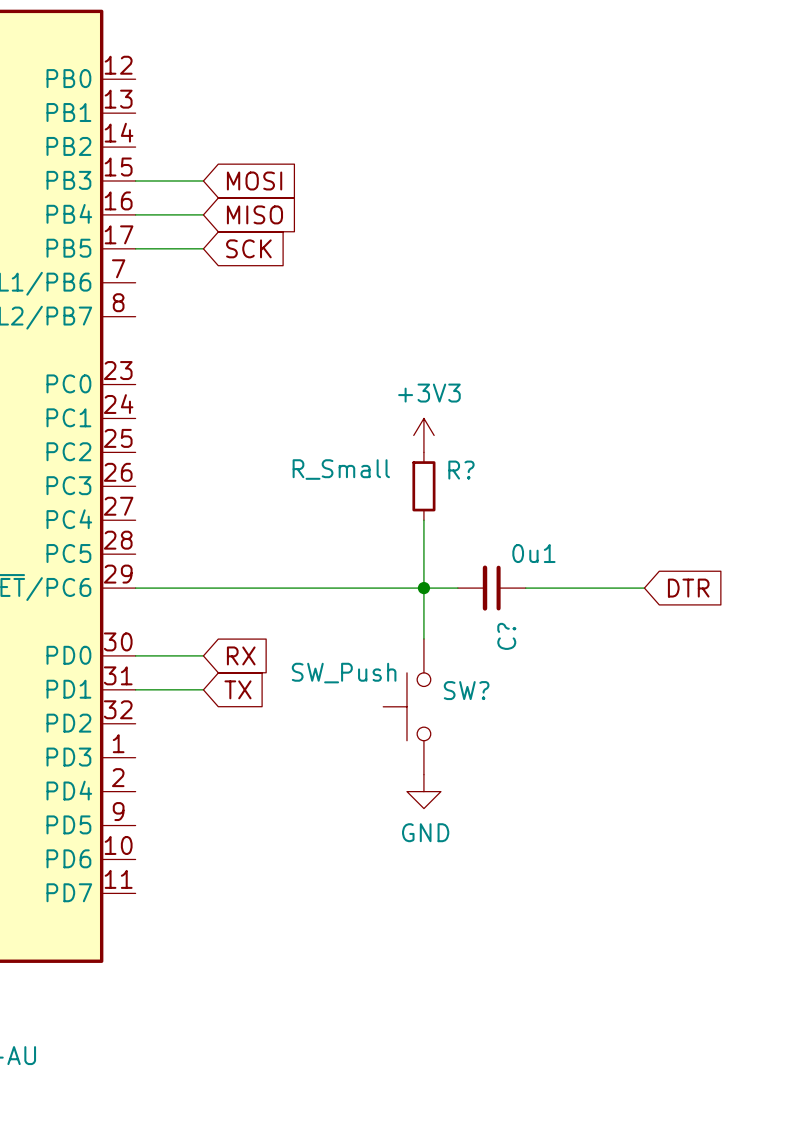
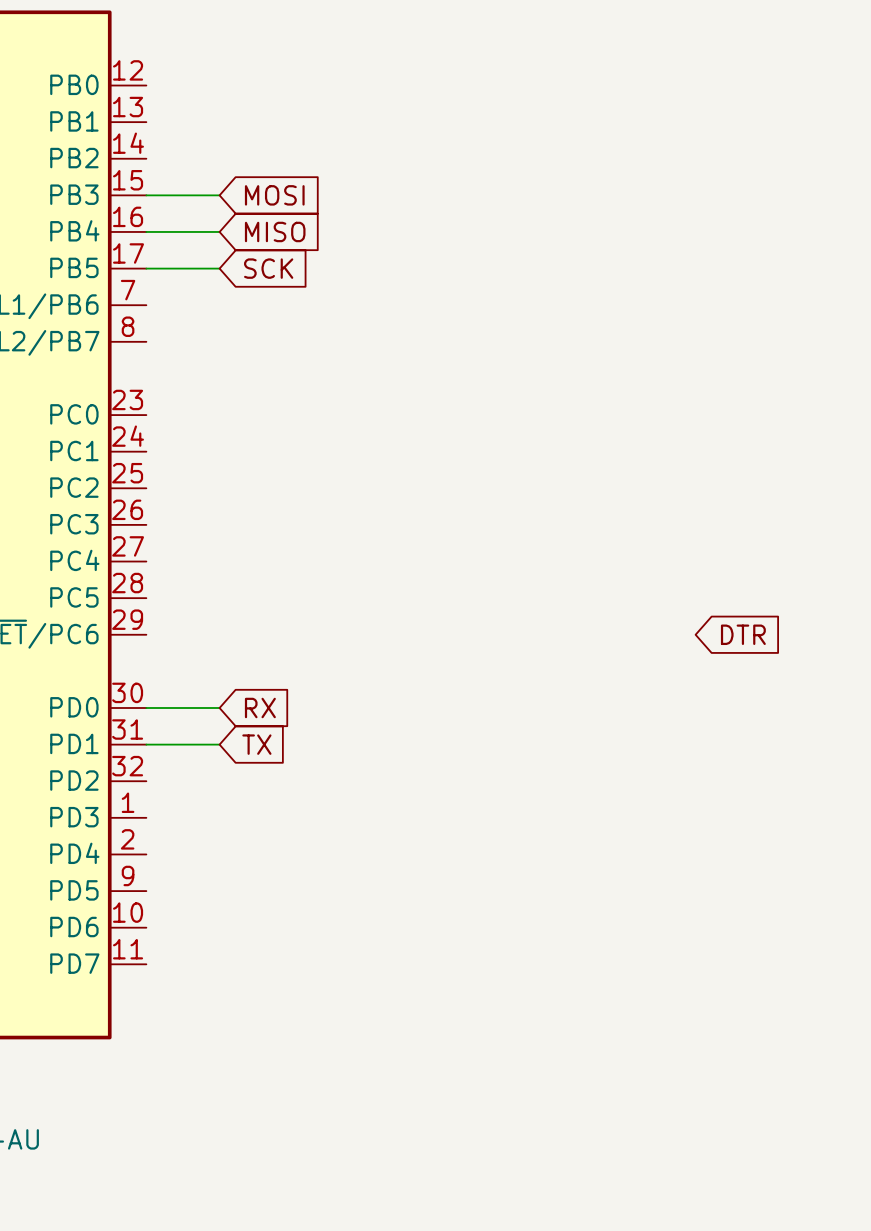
power symbol: +3V3 (423, 435) -> none
R?: R_Small (423, 486) -> none
wire: (423, 520) (423, 638) -> none
wire: (135, 588) (457, 588) -> none
junction: (423, 588) -> none
C?: 0u1 (491, 588) -> none
wire: (525, 588) (644, 588) -> none
SW?: SW_Push (406, 706) -> none
power symbol: GND (423, 791) -> none

